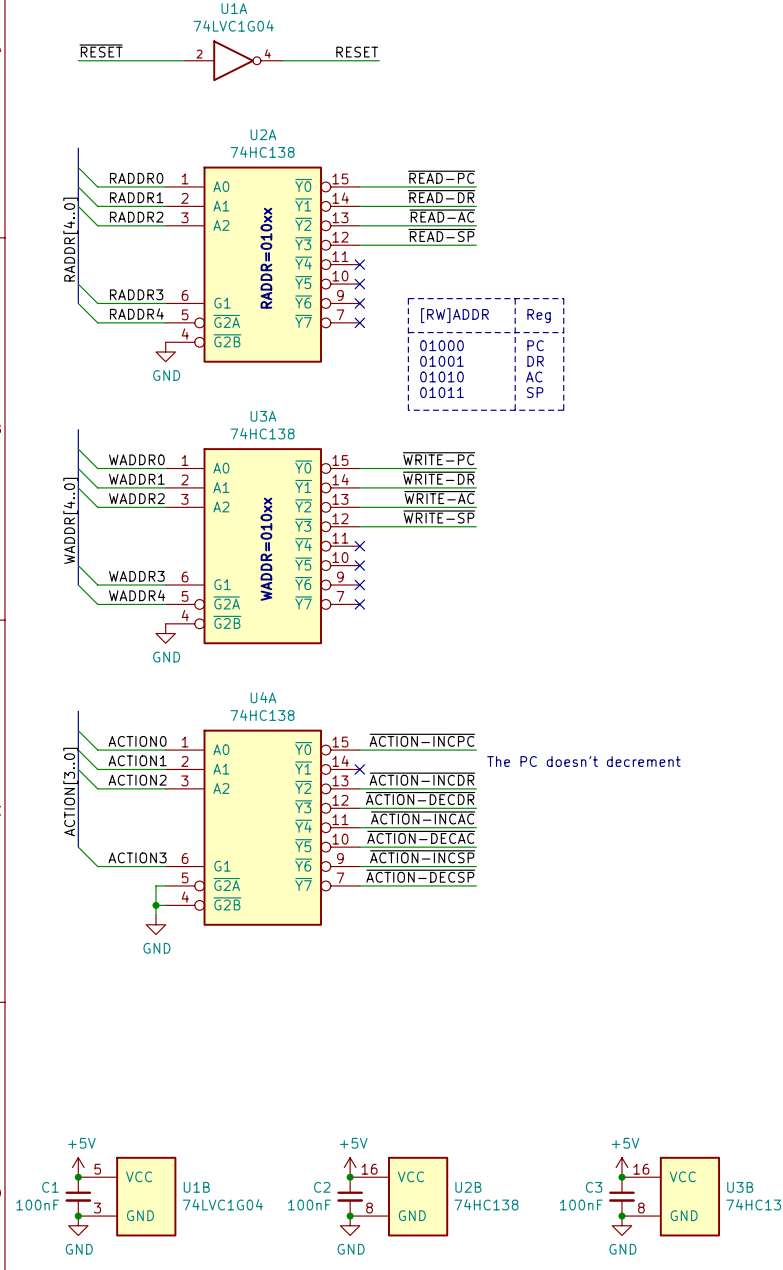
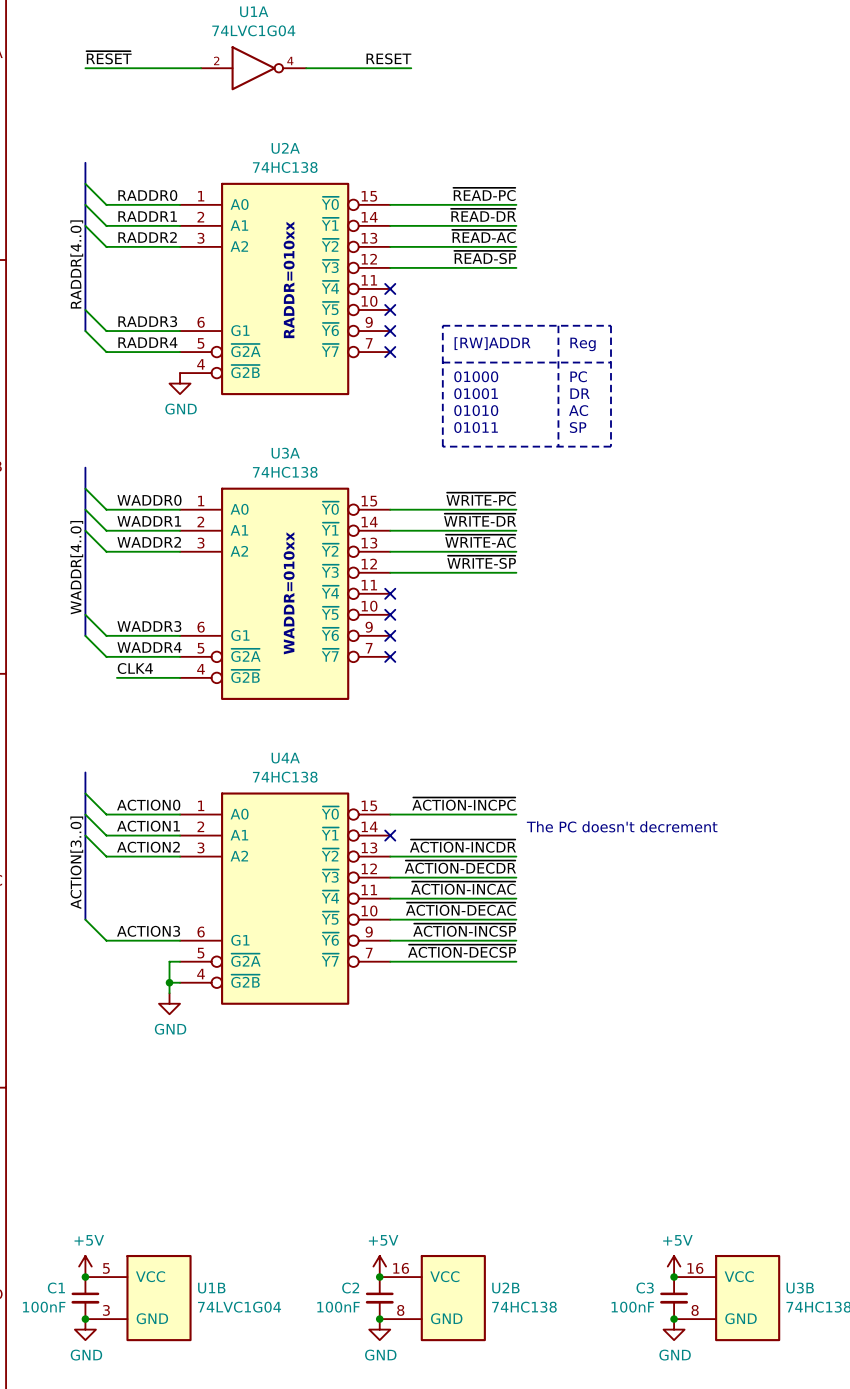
label: none -> CLK4 (135, 668)
wire: none -> (116, 677) (180, 677)
power symbol: GND (165, 633) -> none

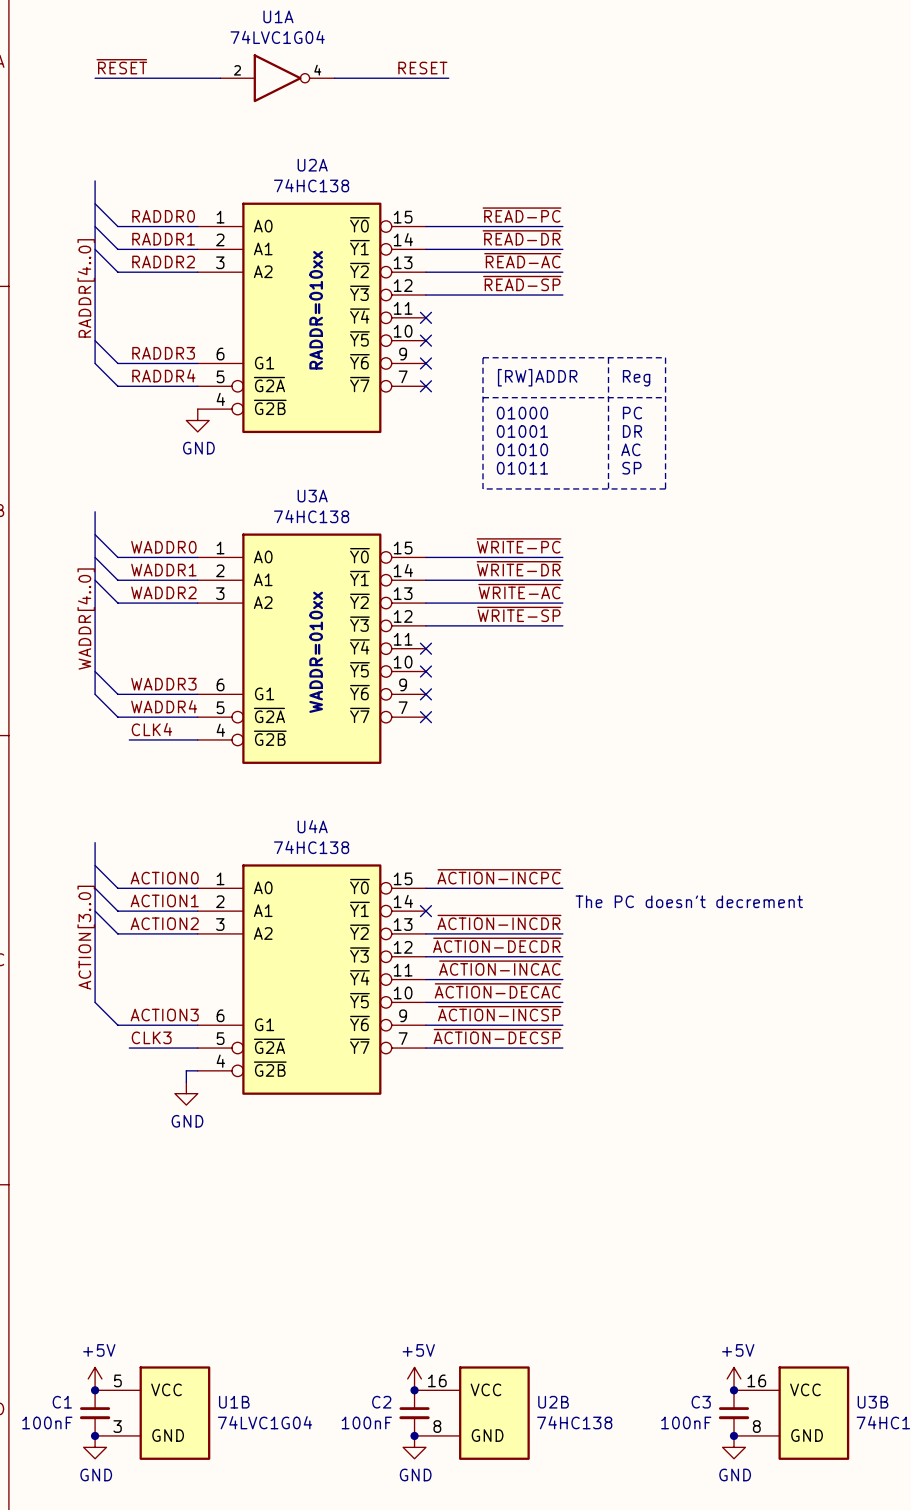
label: none -> CLK3 (151, 1037)
wire: (169, 961) (169, 982) -> (186, 1048) (129, 1048)
junction: (169, 982) -> none

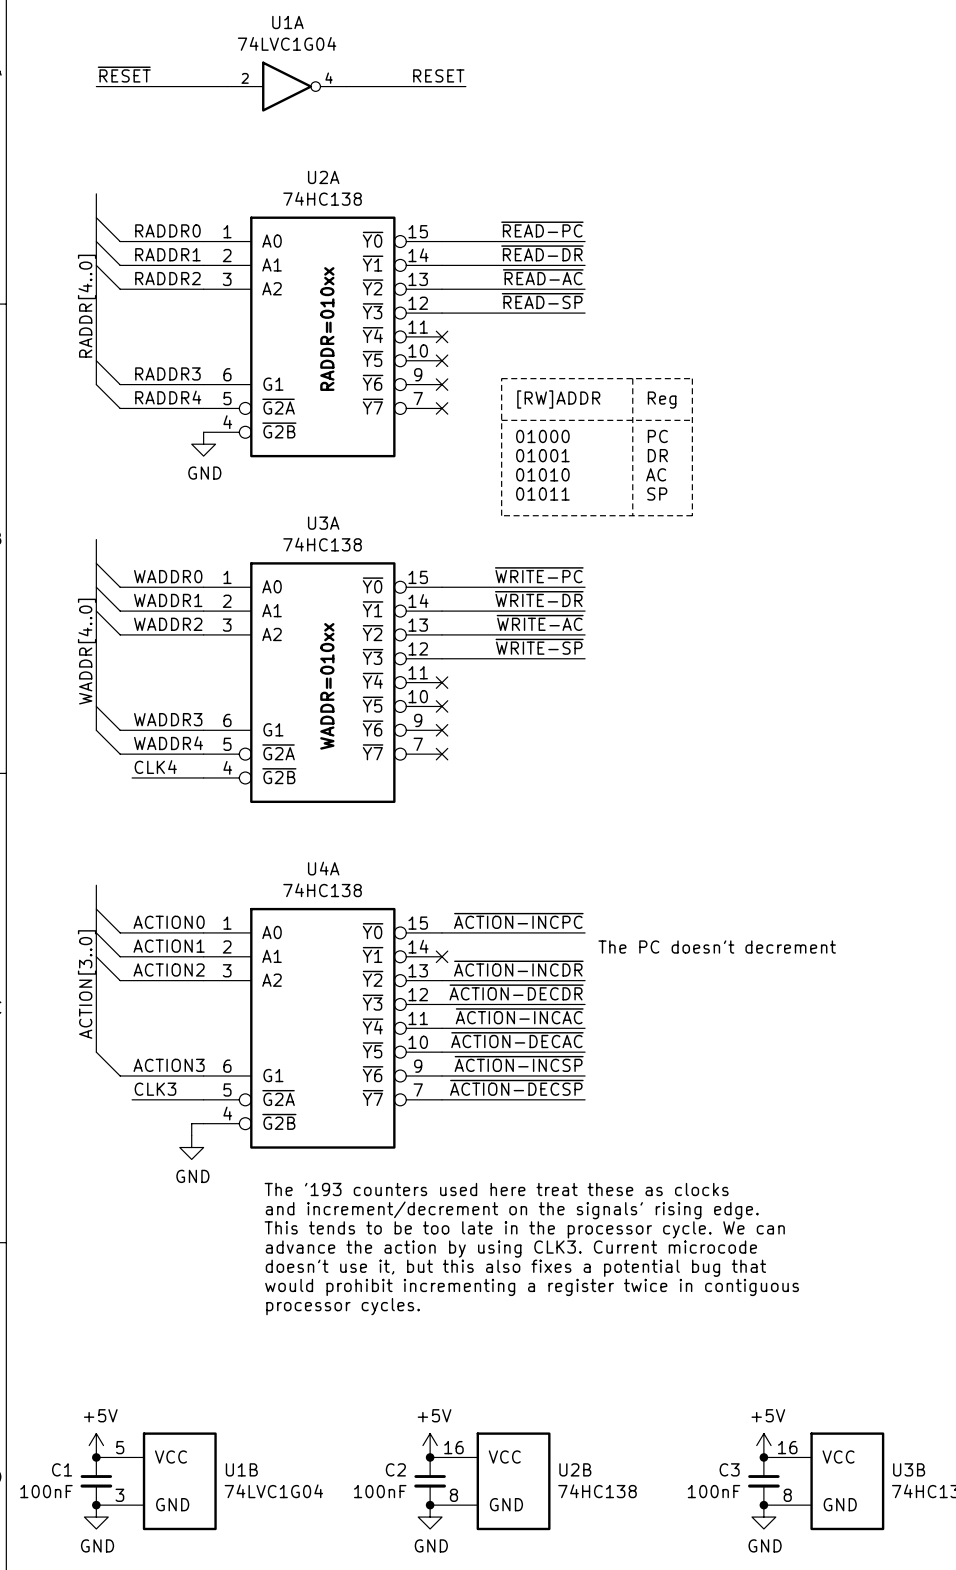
text: none -> The '193 counters used here treat these as clocks (496, 1189)
text: none -> and increment/decrement on the signals' rising edge. (512, 1210)
text: none -> This tends to be too late in the processor cycle. We can (524, 1229)
text: none -> advance the action by using CLK3. Current microcode (511, 1249)
text: none -> doesn't use it, but this also fixes a potential bug that (515, 1268)
text: none -> would prohibit incrementing a register twice in contiguous (532, 1287)
text: none -> processor cycles. (343, 1306)

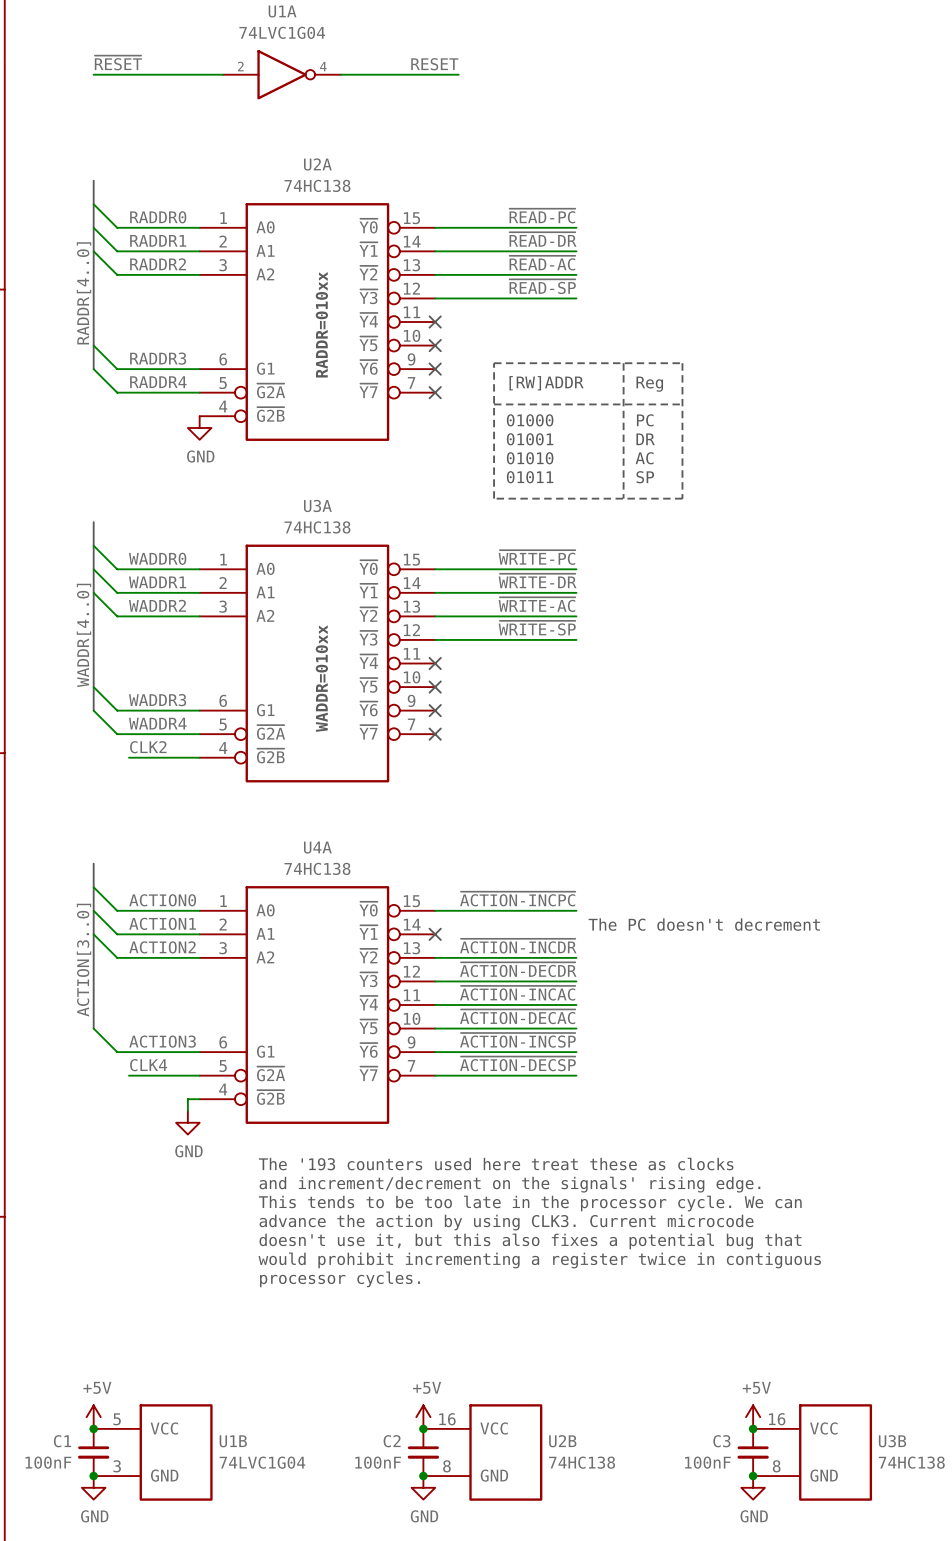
label: CLK4 (155, 767) -> CLK2 (148, 747)
label: CLK3 (155, 1089) -> CLK4 (148, 1065)

